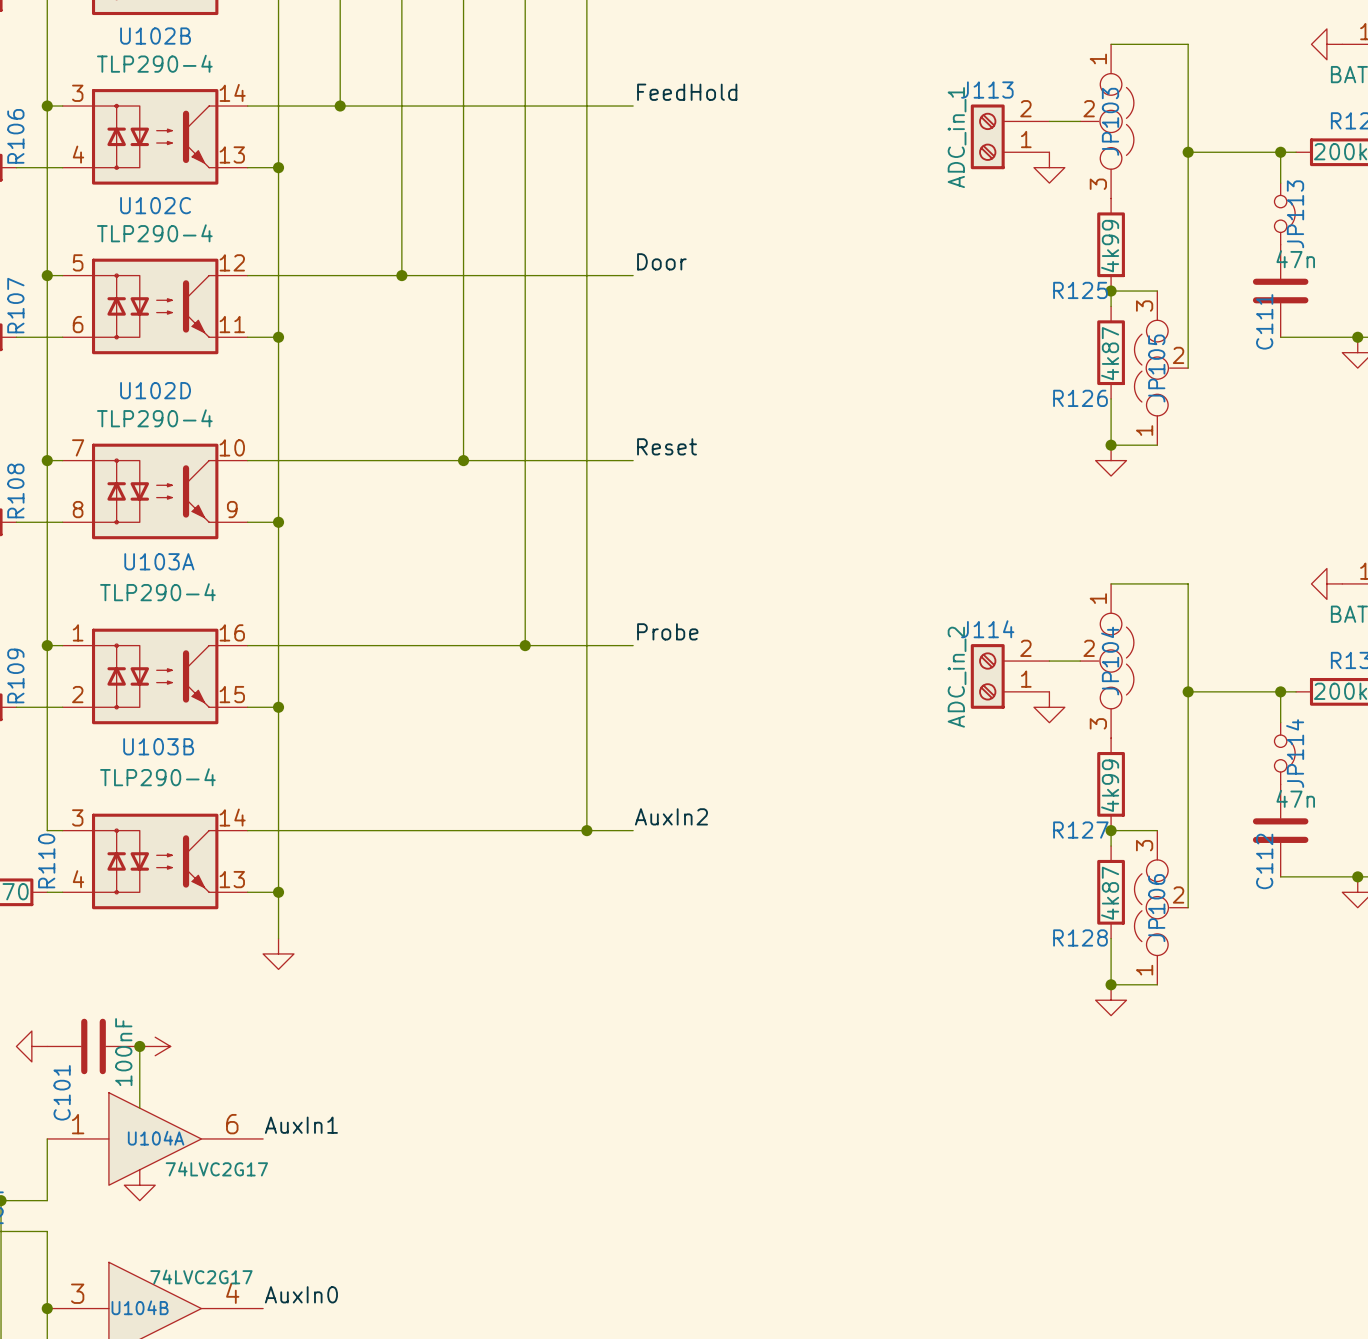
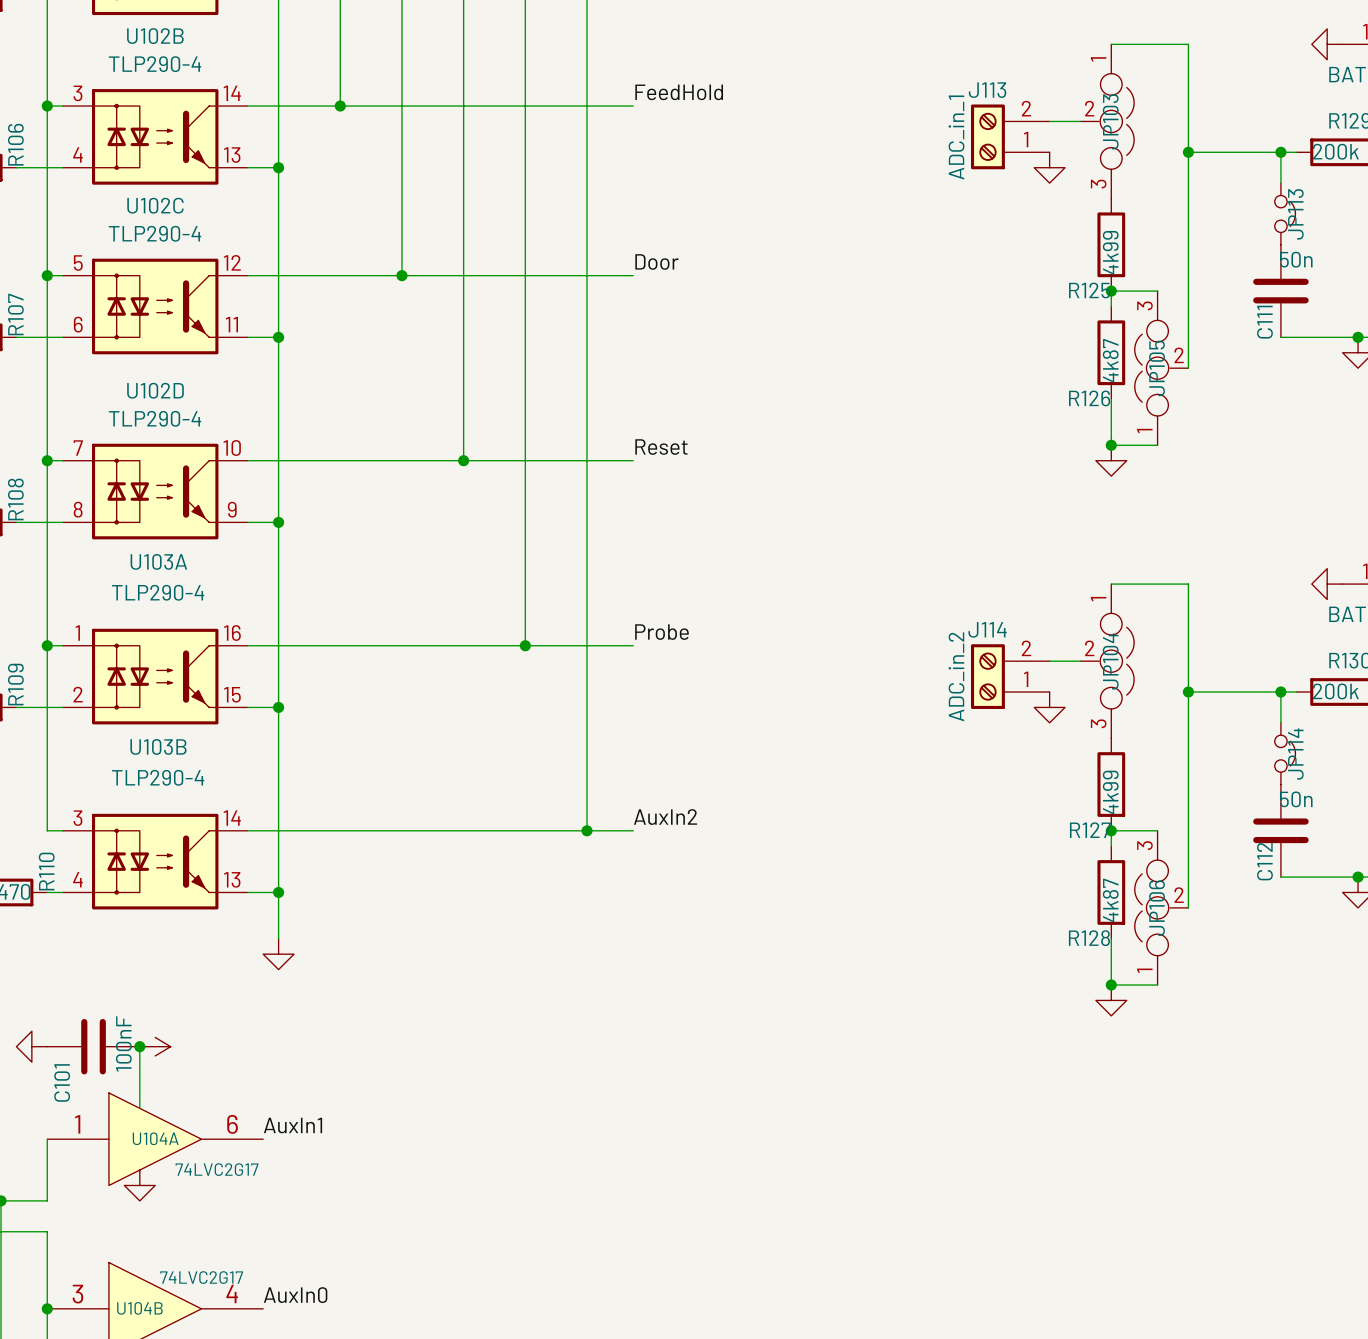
C111 value: 47n (1295, 259) -> 50n (1296, 259)
C112 value: 47n (1295, 798) -> 50n (1296, 799)

